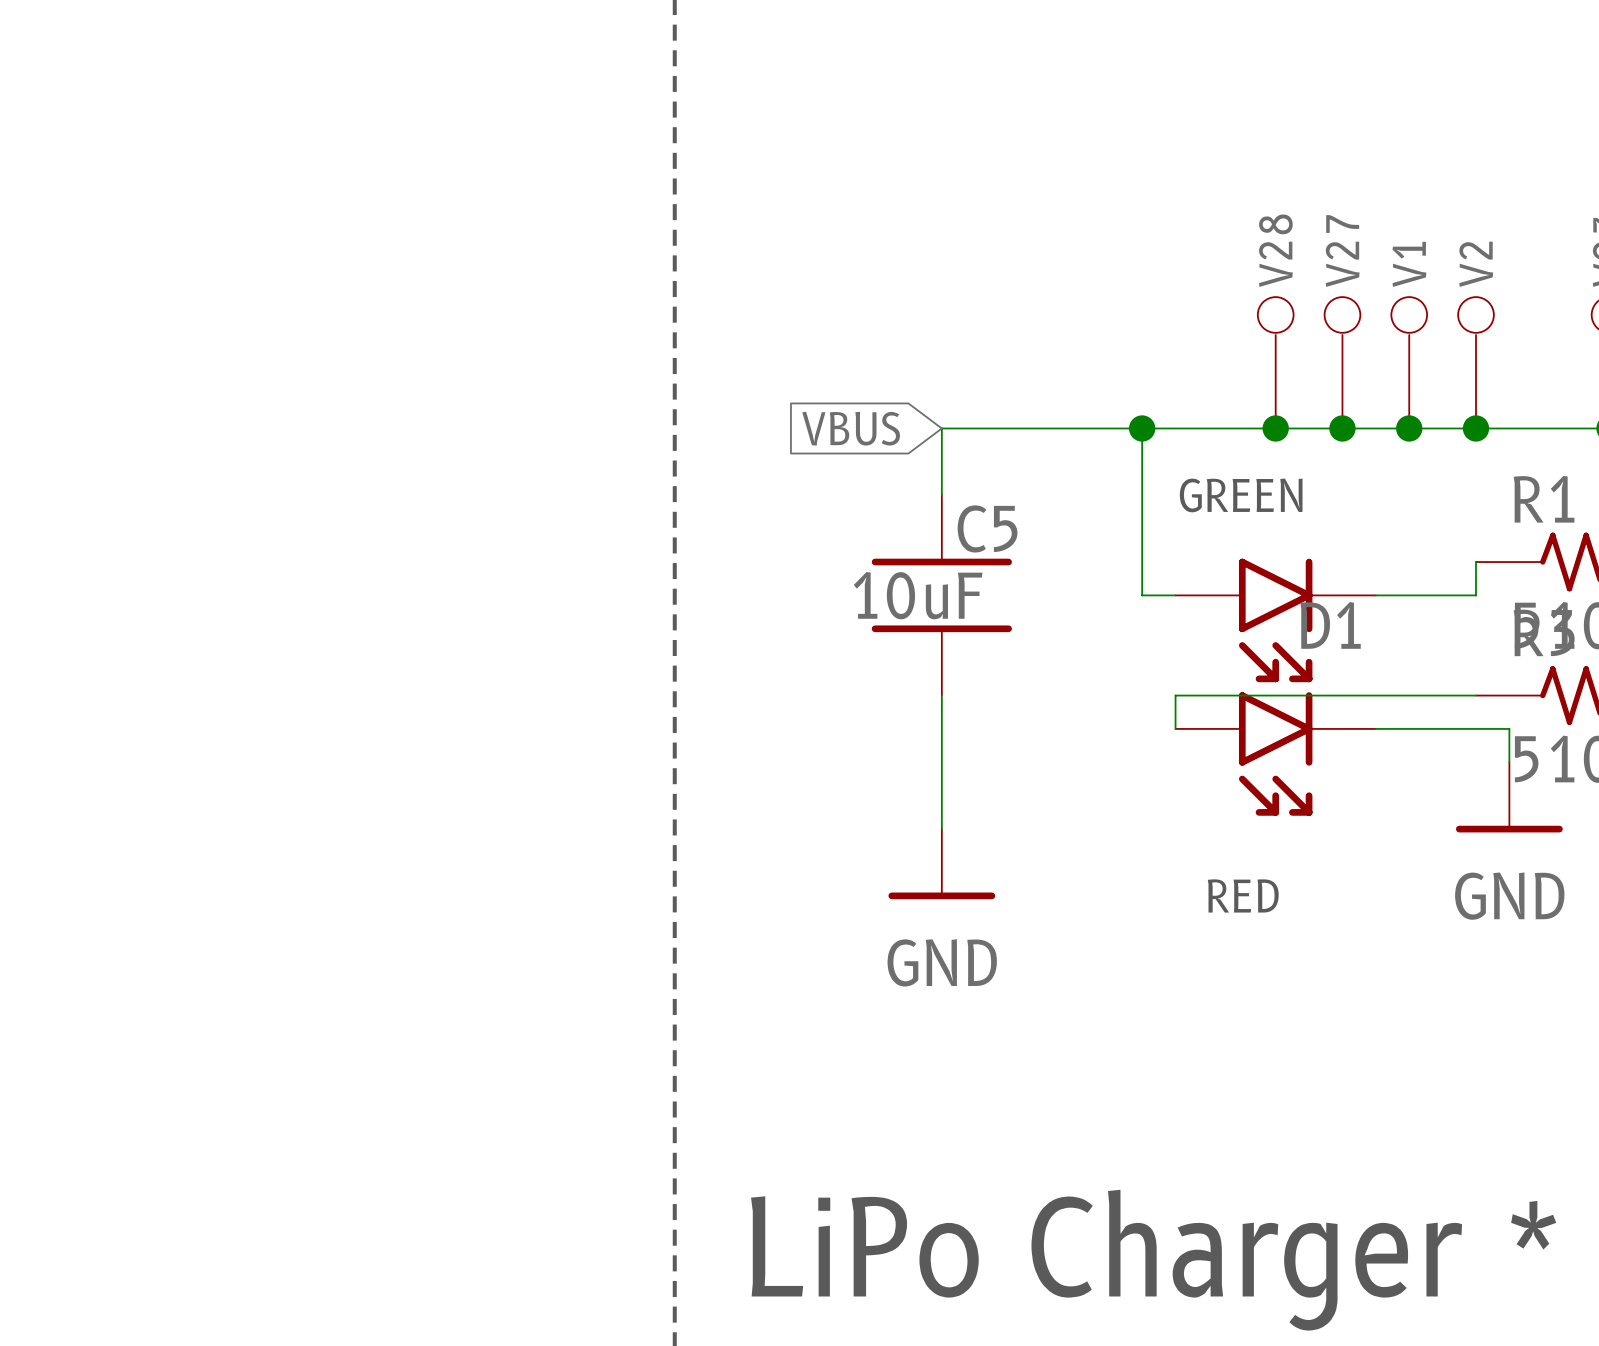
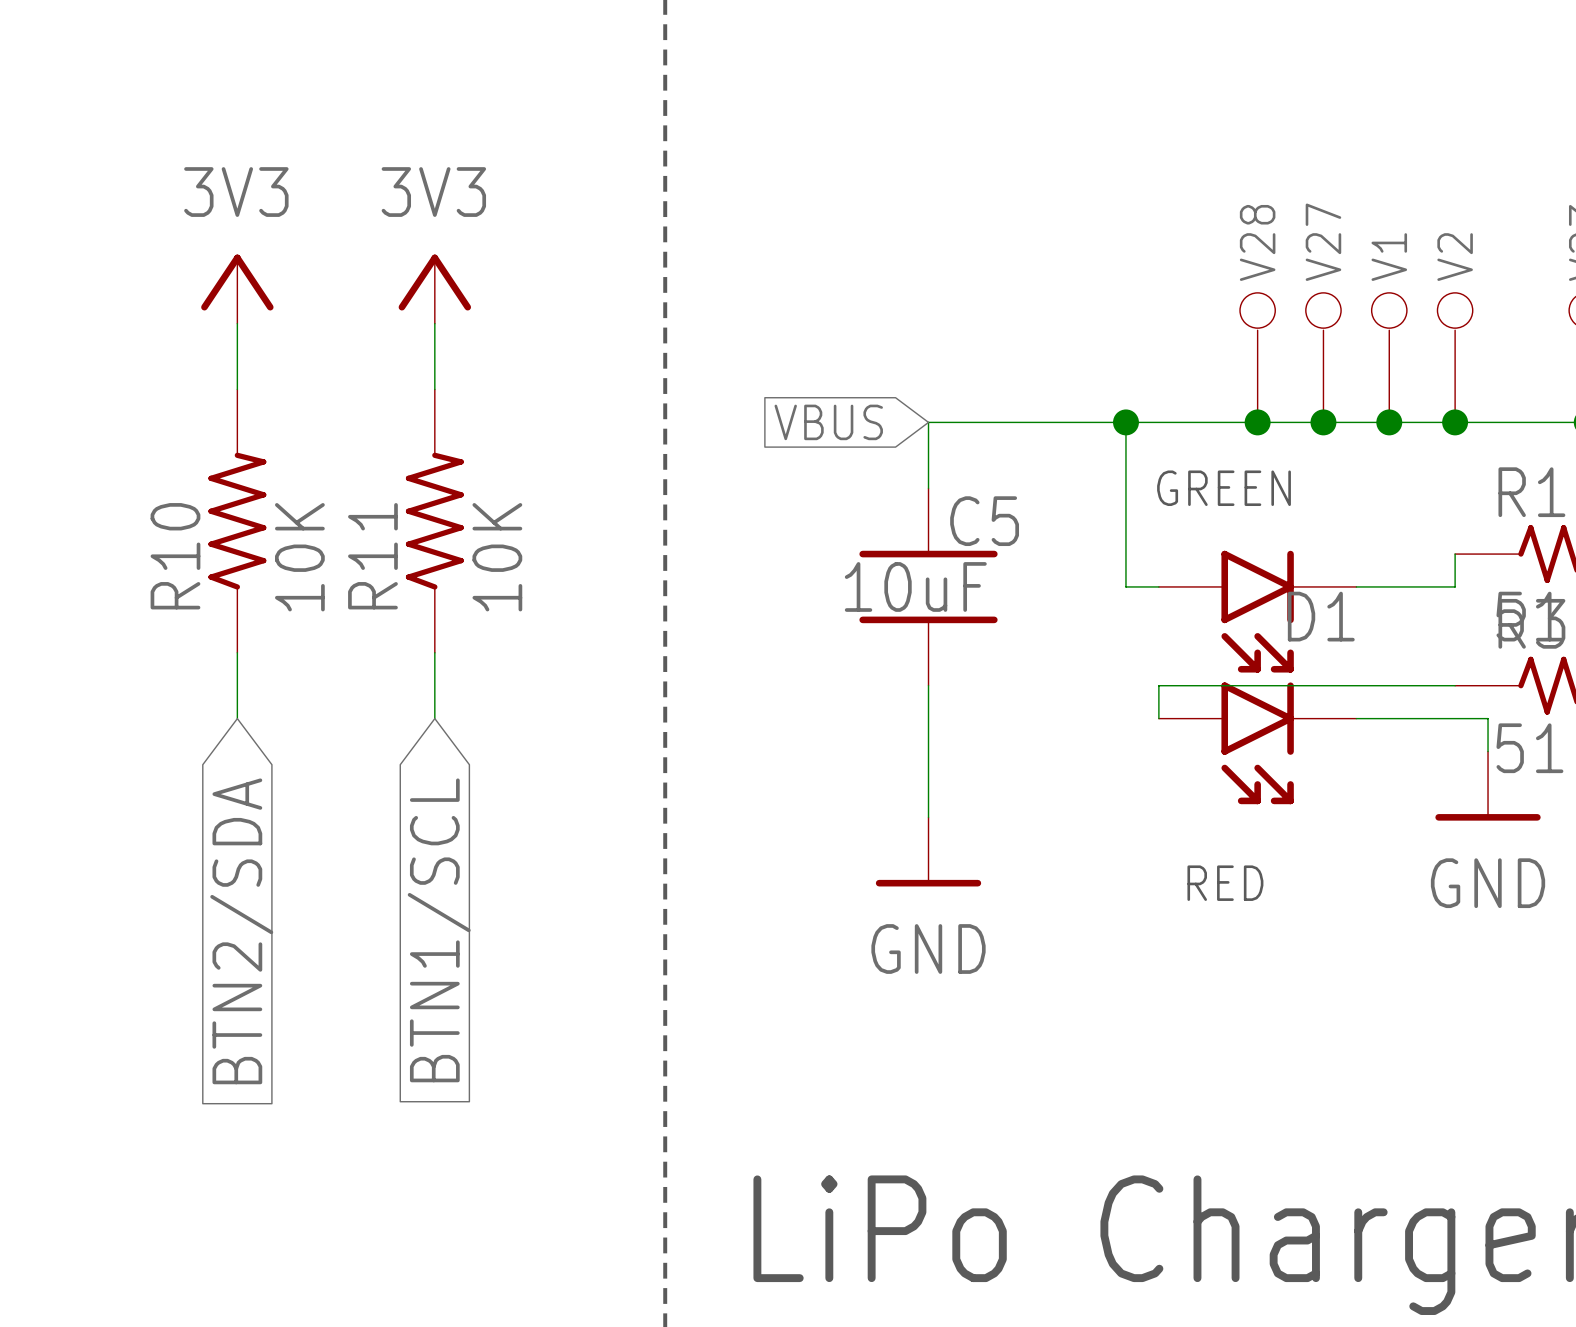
power symbol: none -> 3V3 (237, 289)
power symbol: none -> 3V3 (434, 289)
wire: none -> (237, 323) (237, 389)
wire: none -> (434, 323) (434, 389)
R10: none -> 10K (237, 521)
R11: none -> 10K (434, 521)
wire: none -> (237, 652) (237, 718)
wire: none -> (434, 652) (434, 718)
global label: none -> BTN1/SCL (439, 930)
global label: none -> BTN2/SDA (241, 931)

